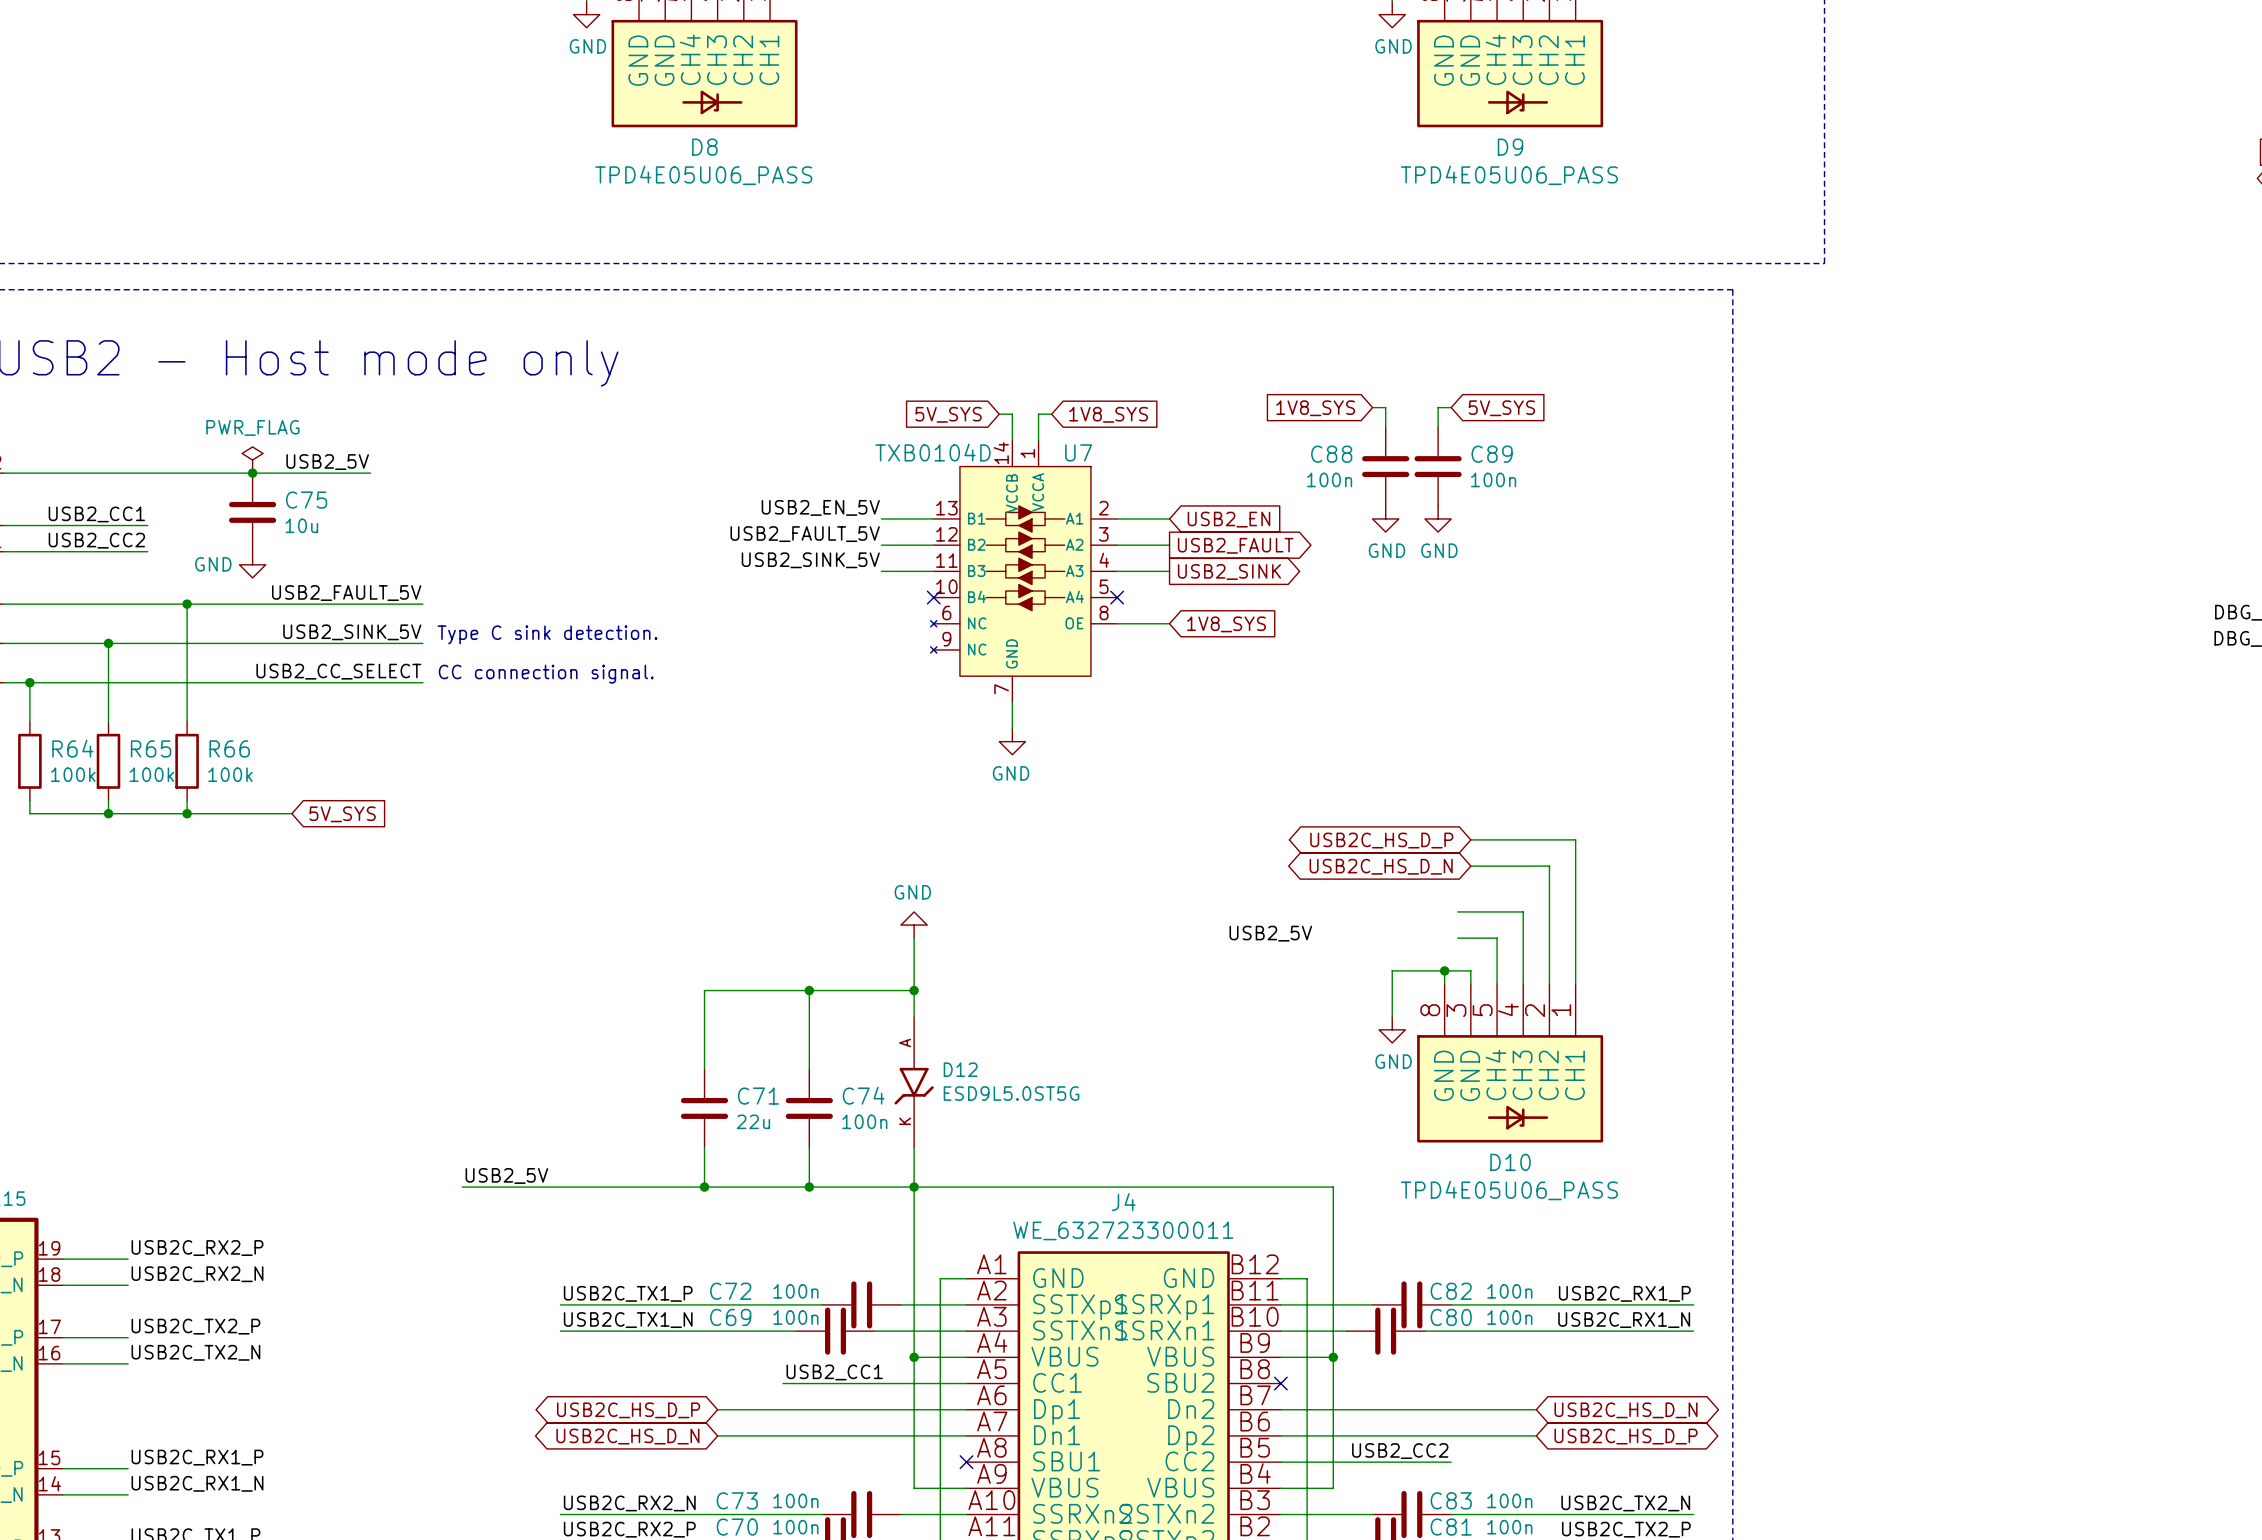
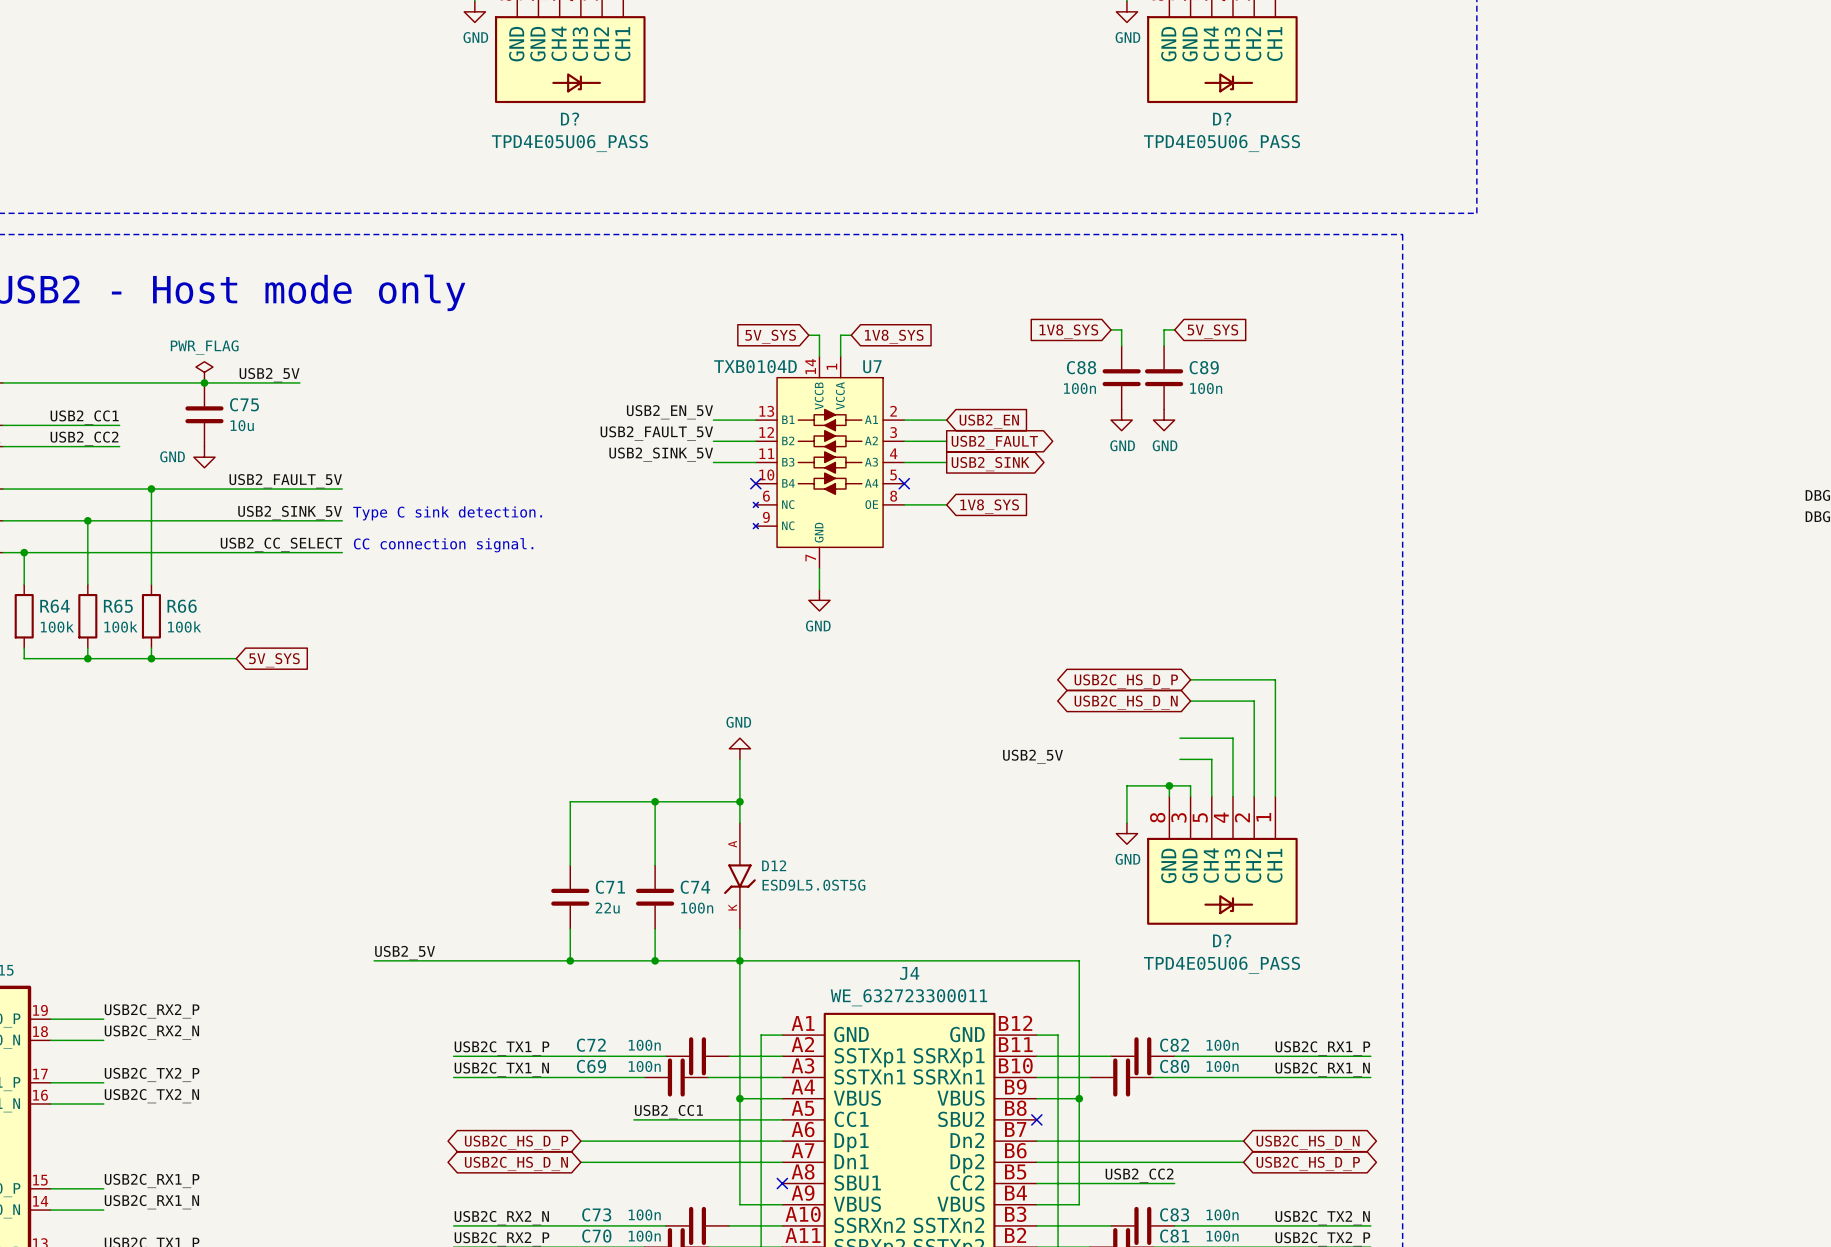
D8 name: D8 (704, 147) -> D? (570, 118)
D9 name: D9 (1510, 147) -> D? (1222, 118)
D10 name: D10 (1510, 1162) -> D? (1222, 940)

